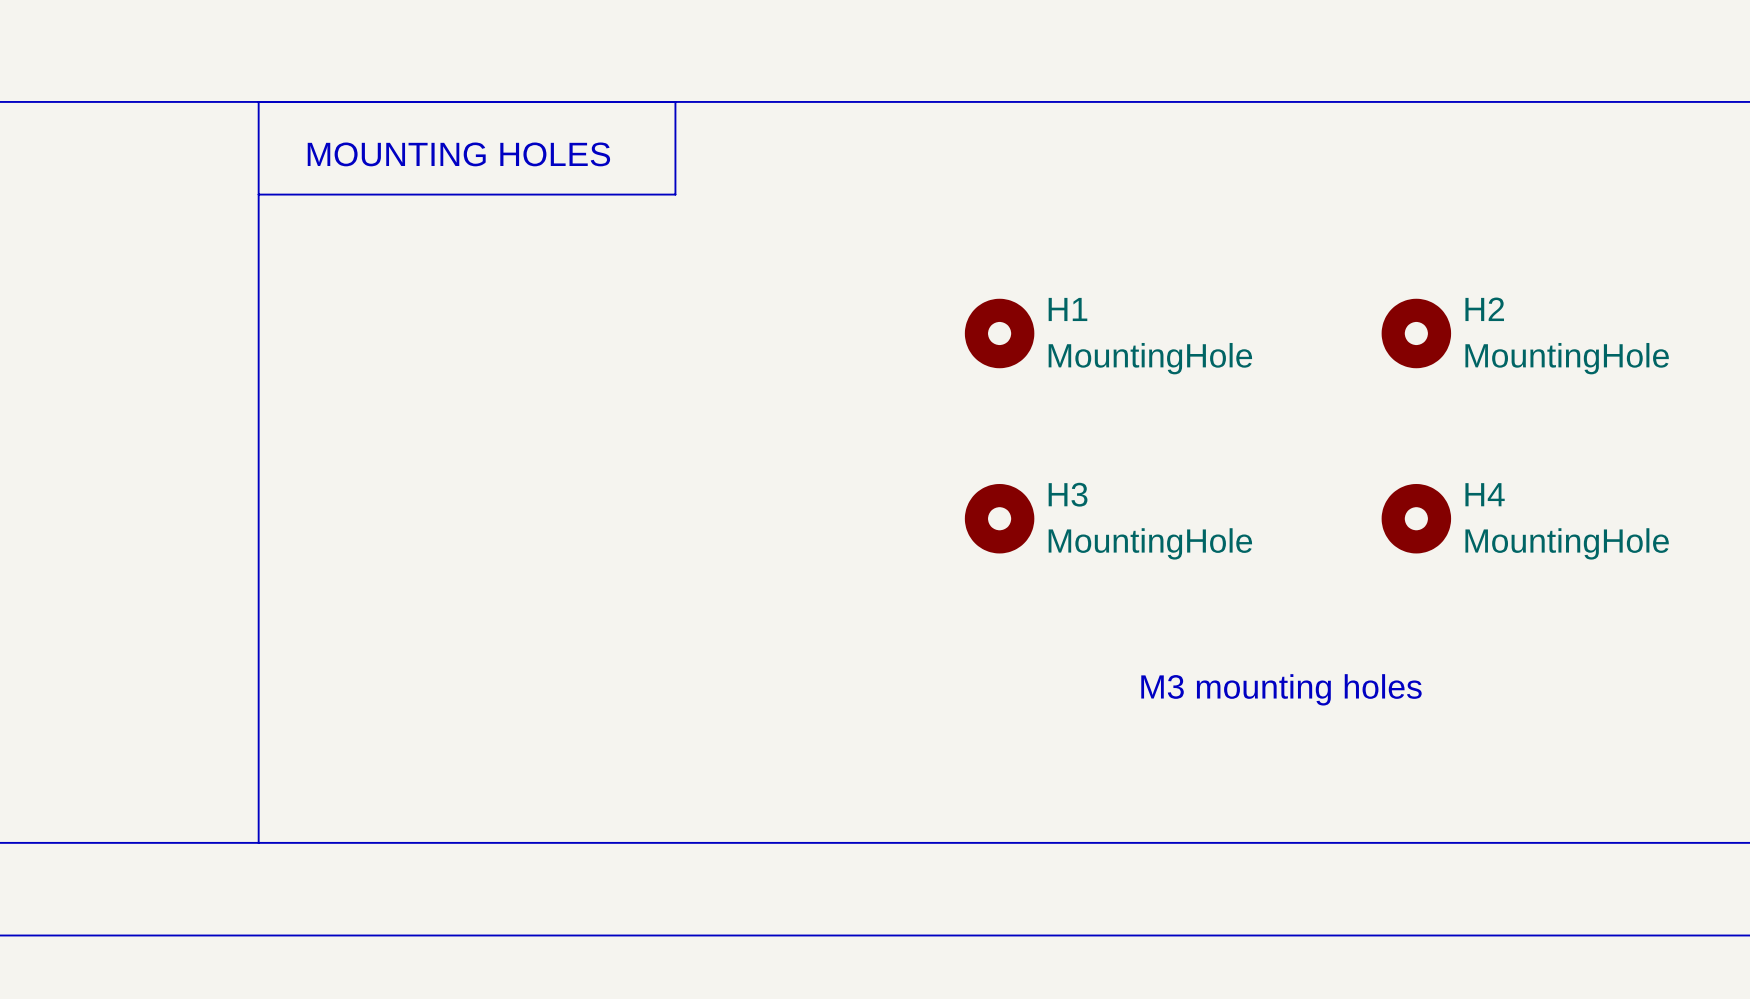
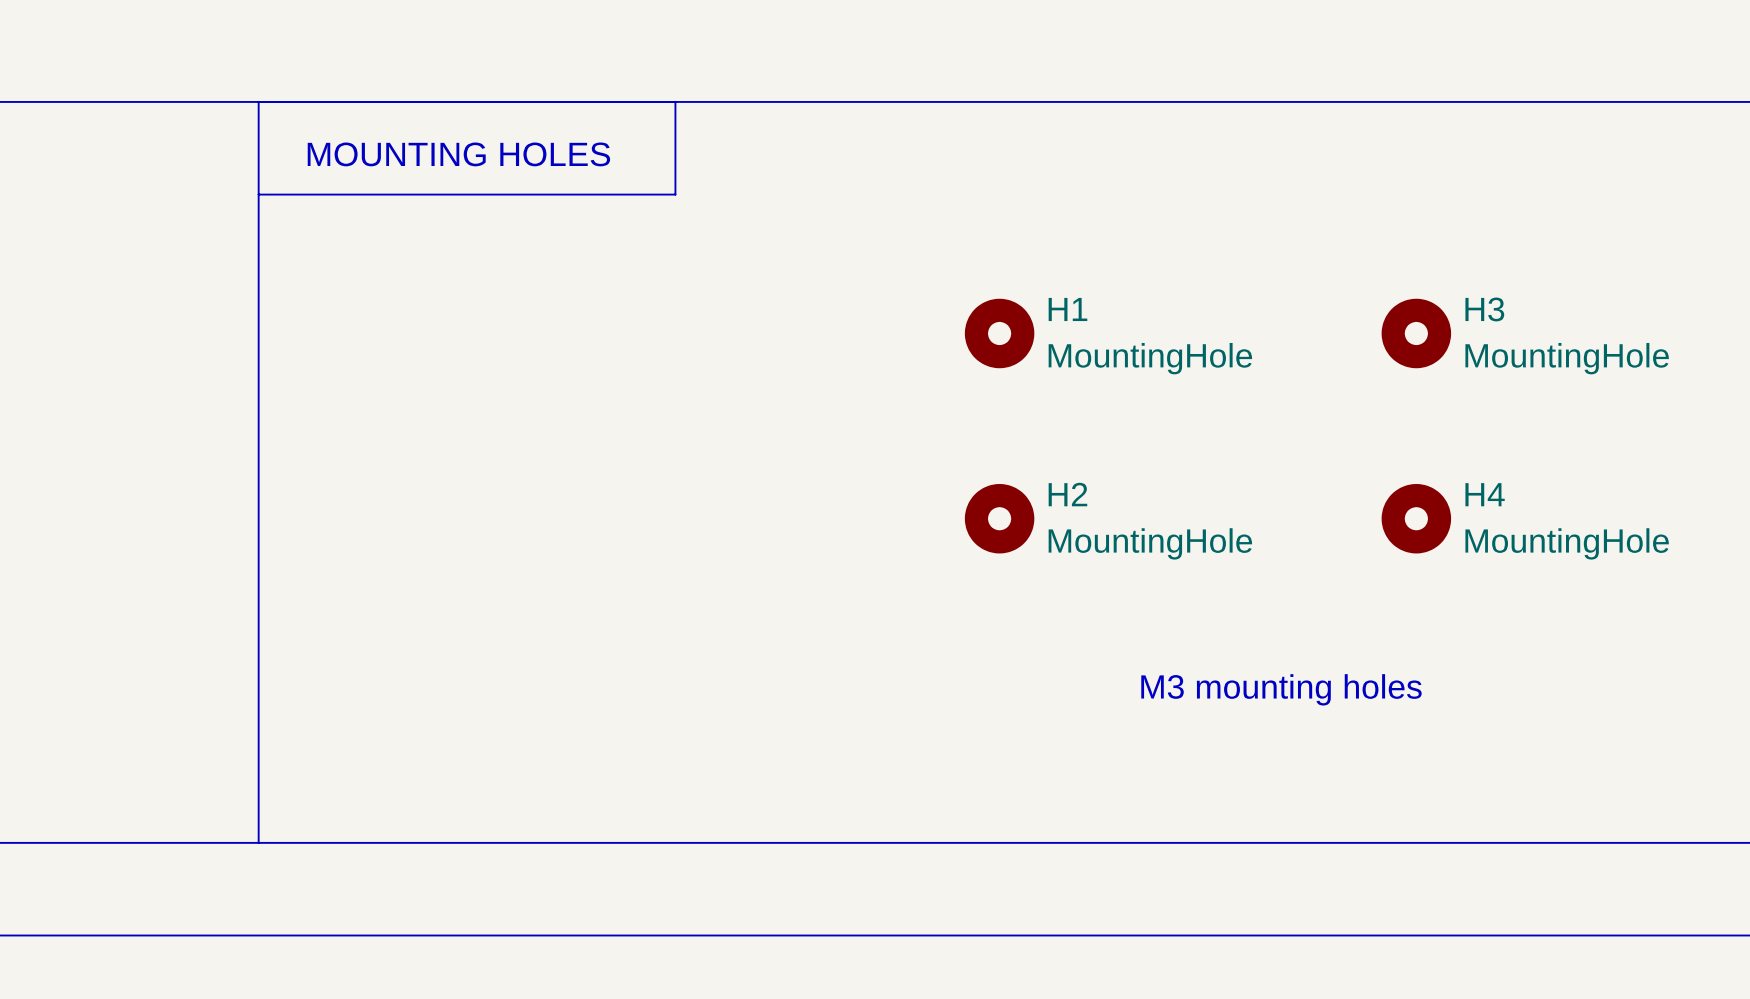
H2 name: H2 (1484, 309) -> H3 (1484, 309)
H3 name: H3 (1068, 494) -> H2 (1067, 494)

